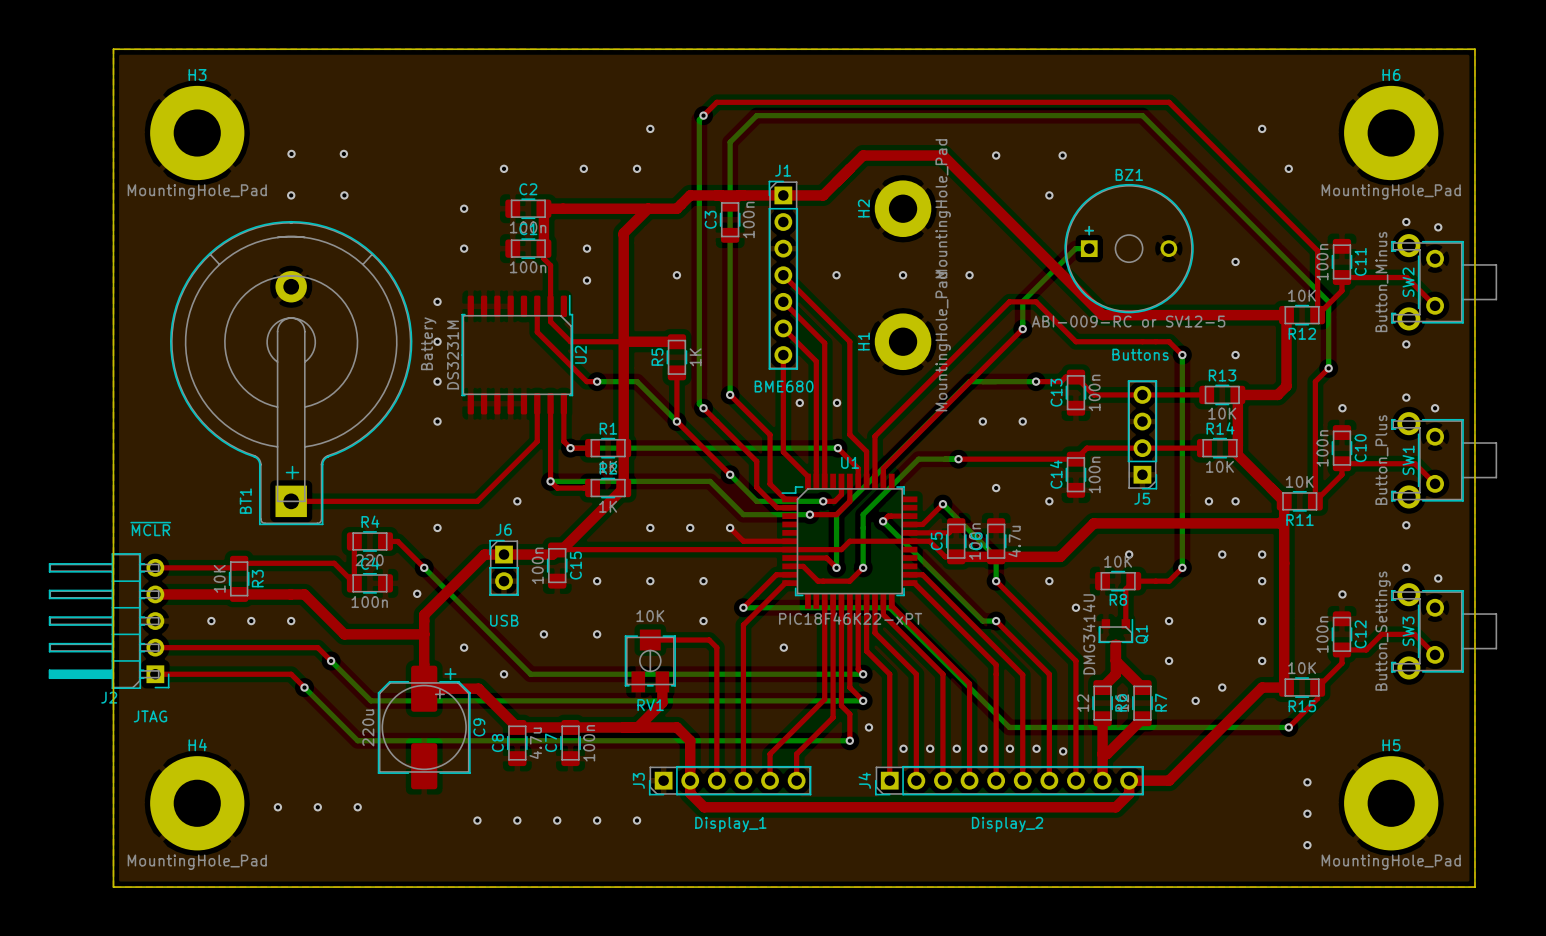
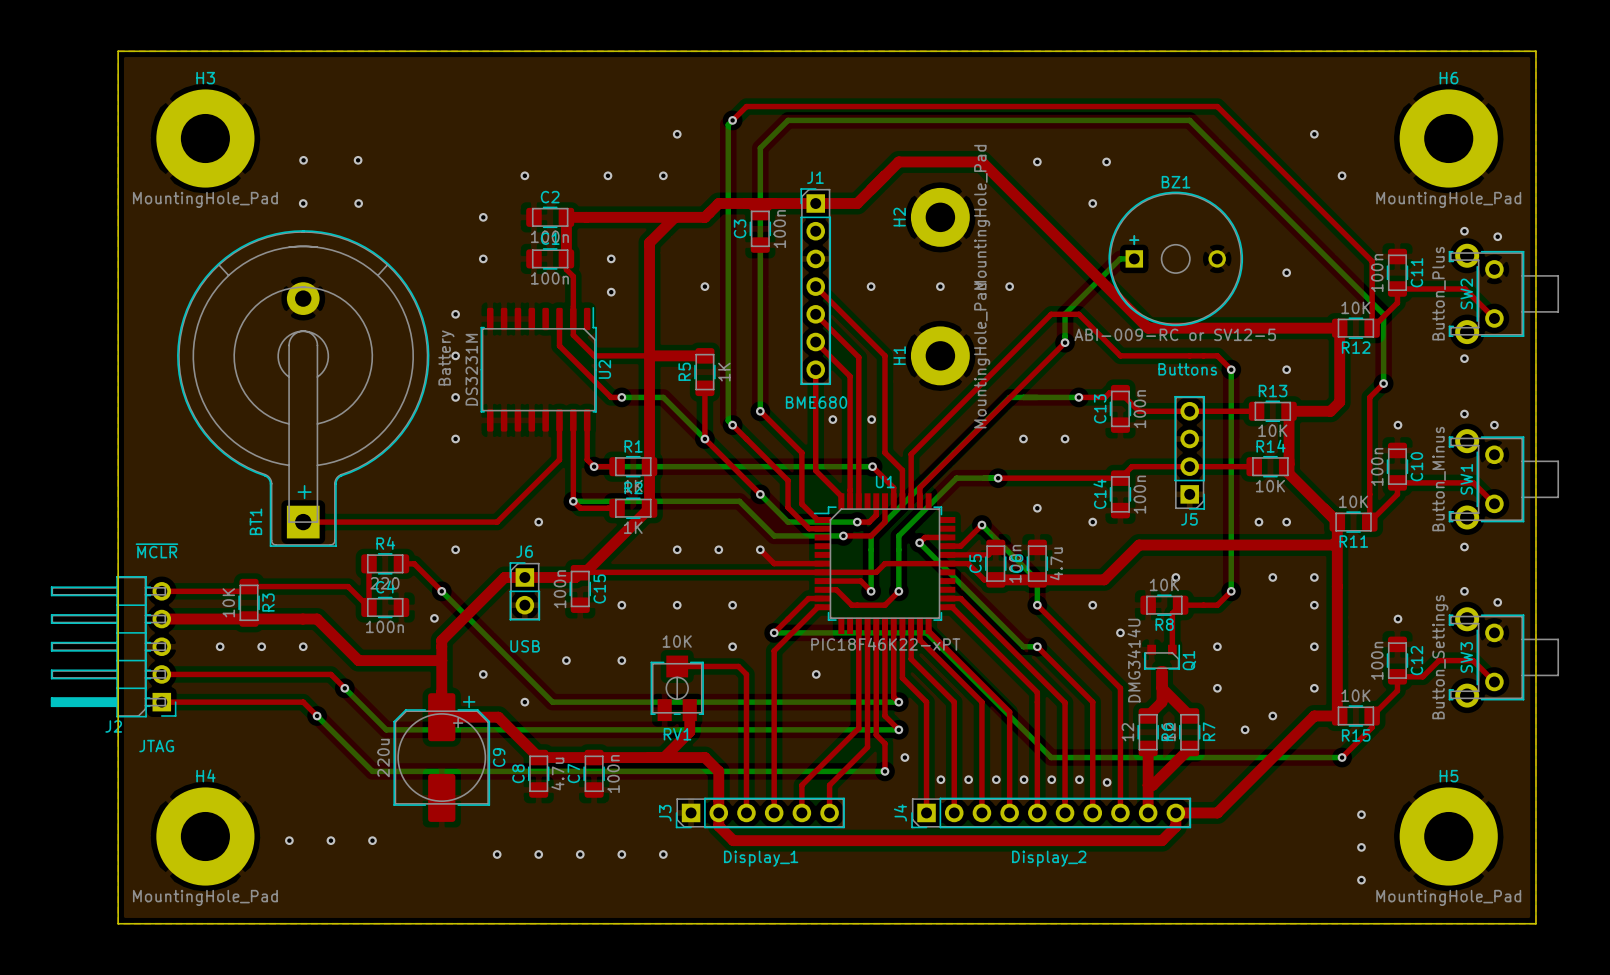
SW2 value: Button_Minus (1381, 282) -> Button_Plus (1439, 293)
SW1 value: Button_Plus (1381, 460) -> Button_Minus (1439, 479)

